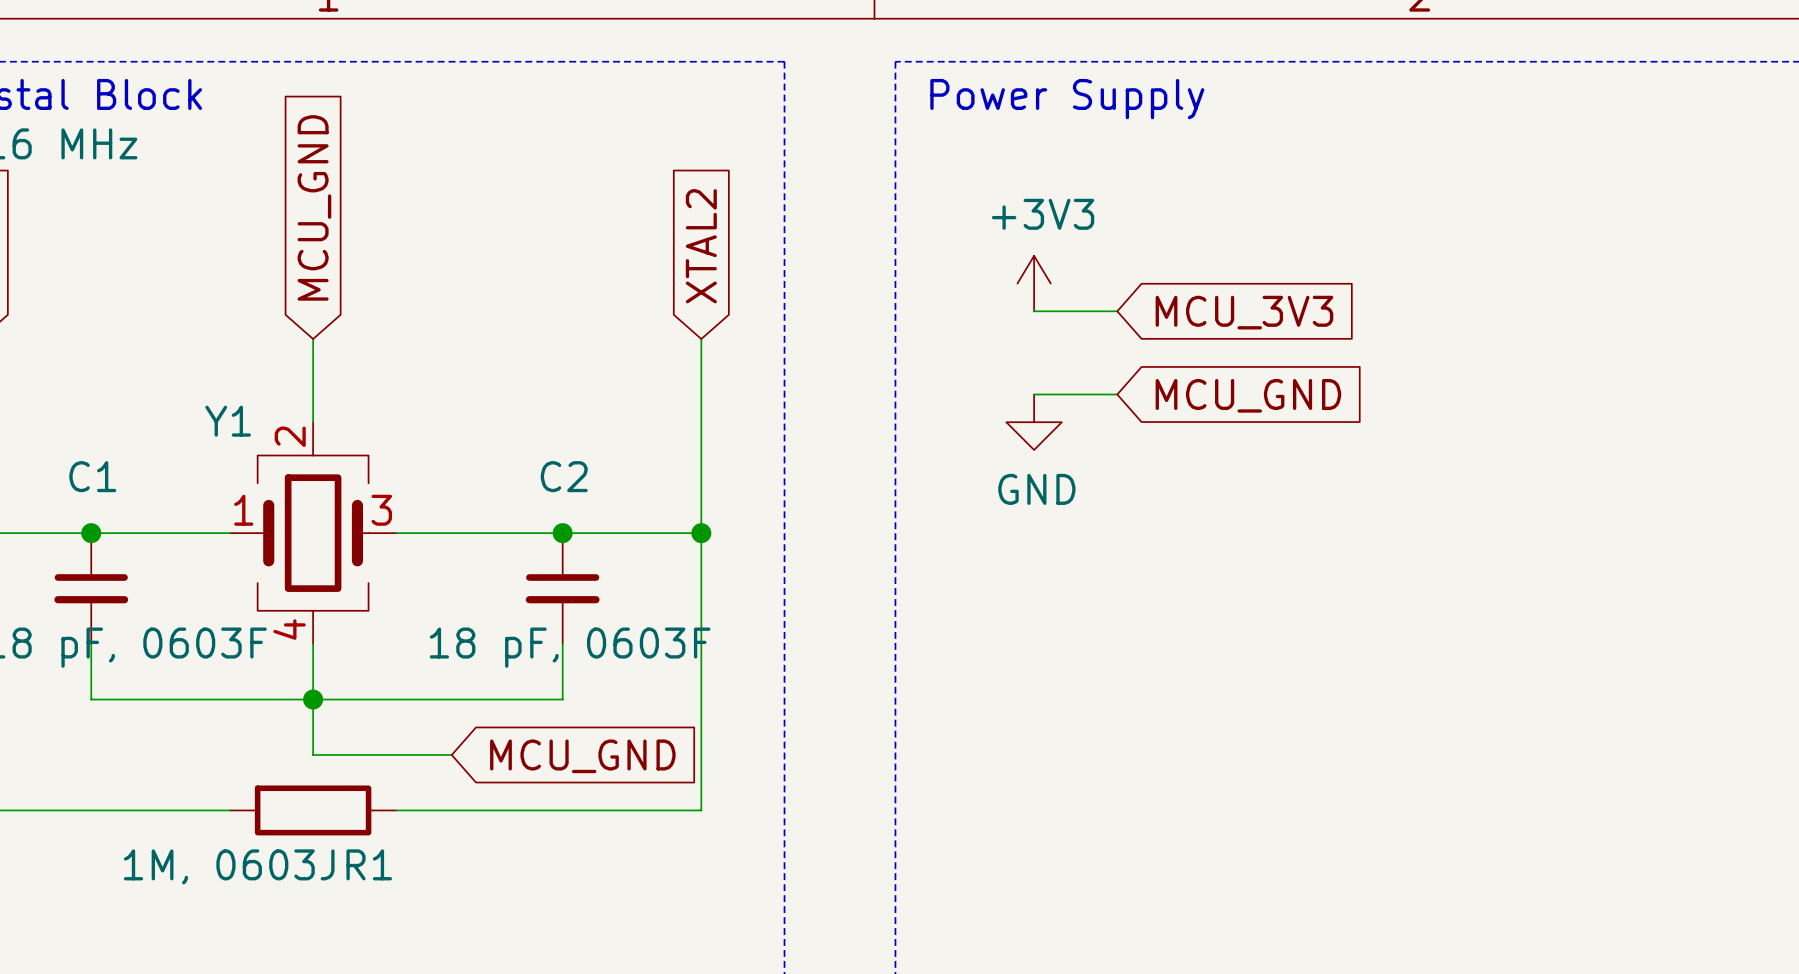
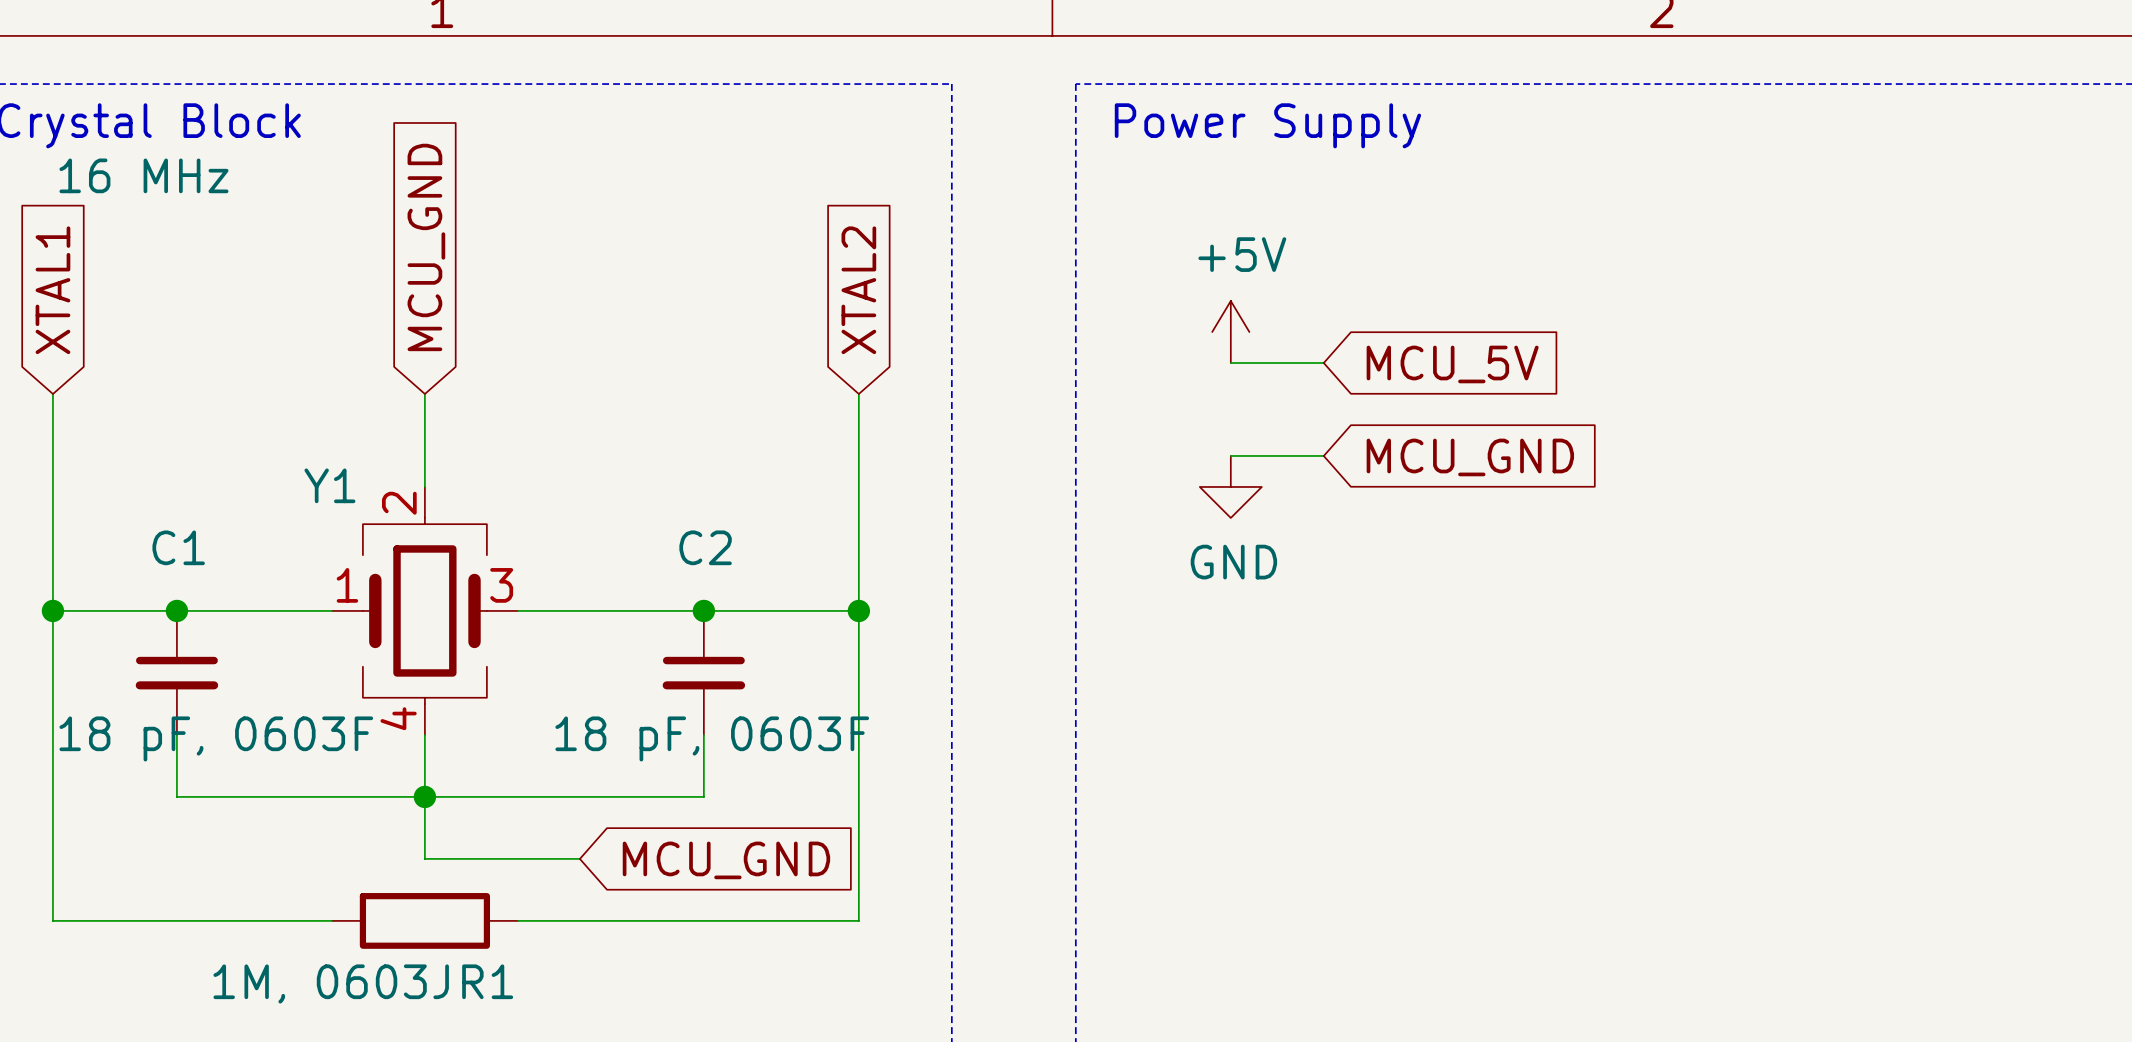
power symbol: +3V3 (1034, 283) -> +5V (1230, 332)
global label: MCU_3V3 (1244, 312) -> MCU_5V (1452, 364)

